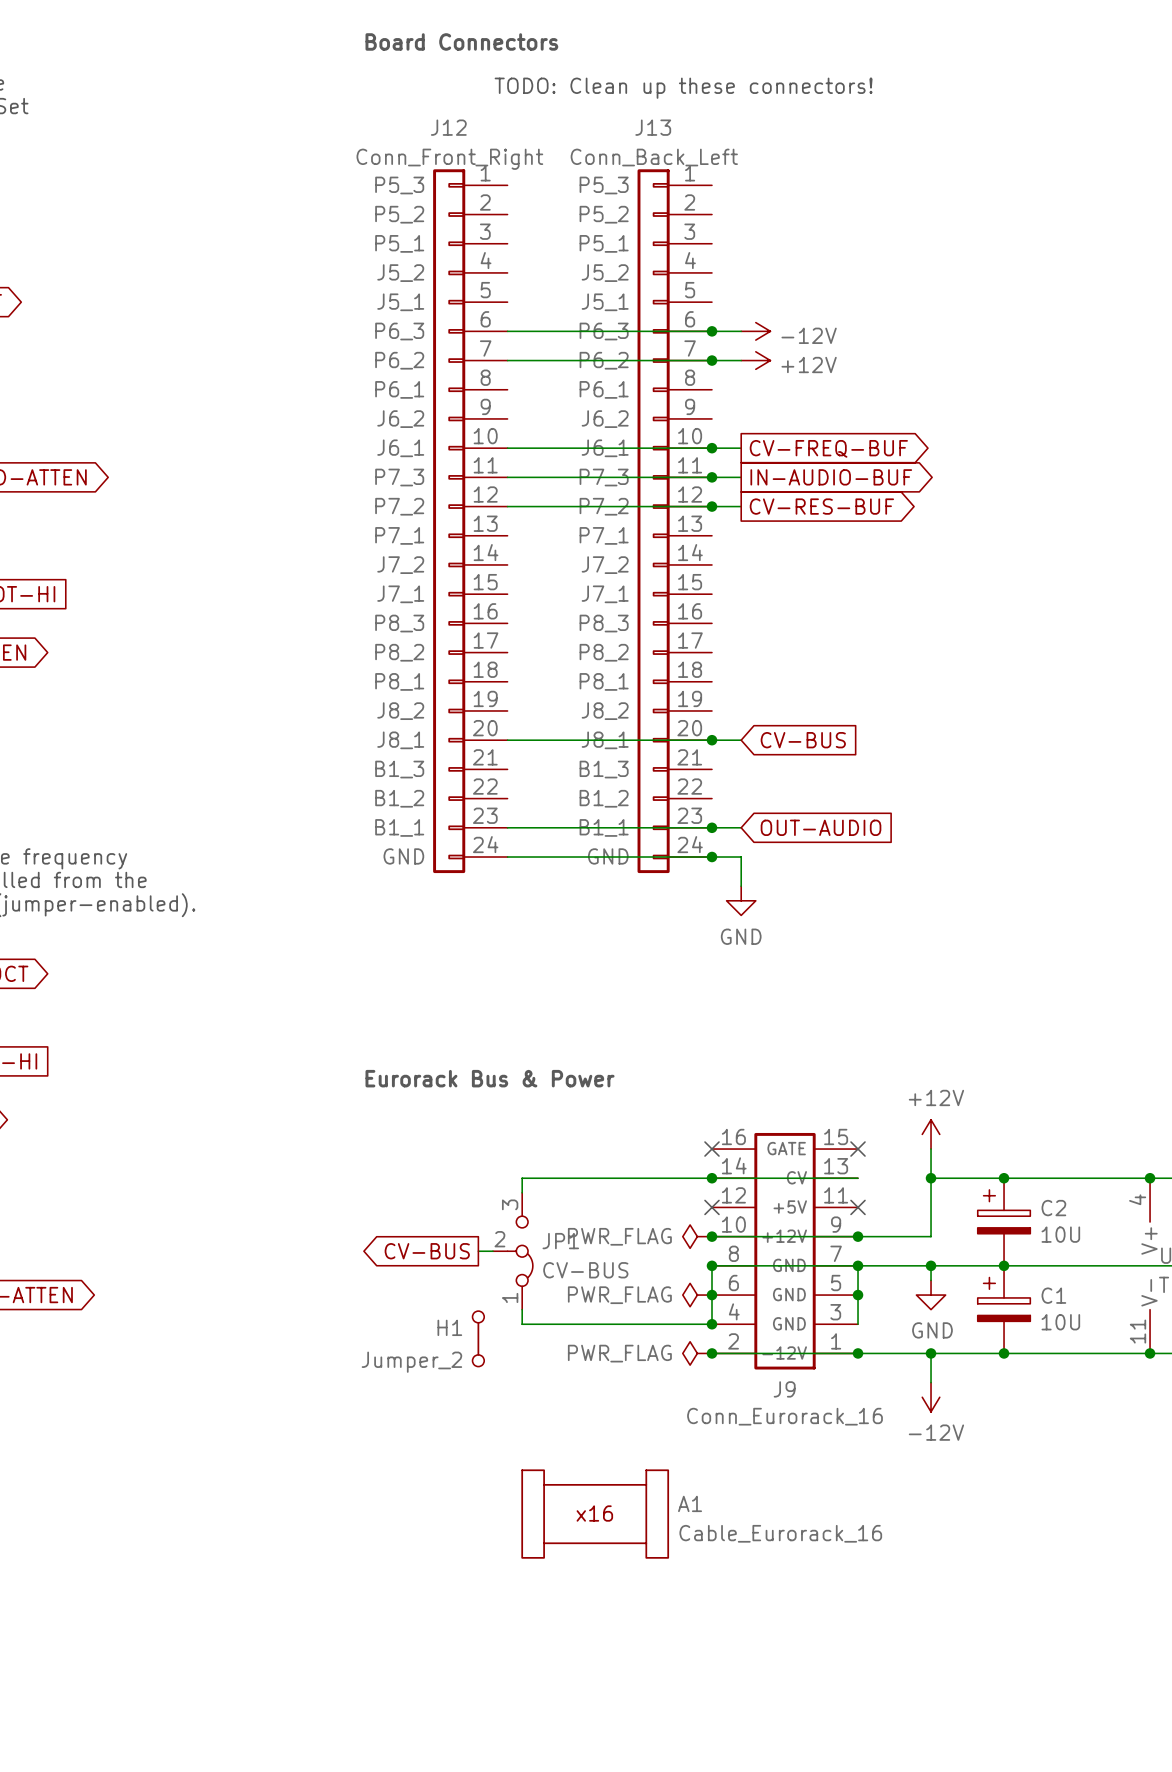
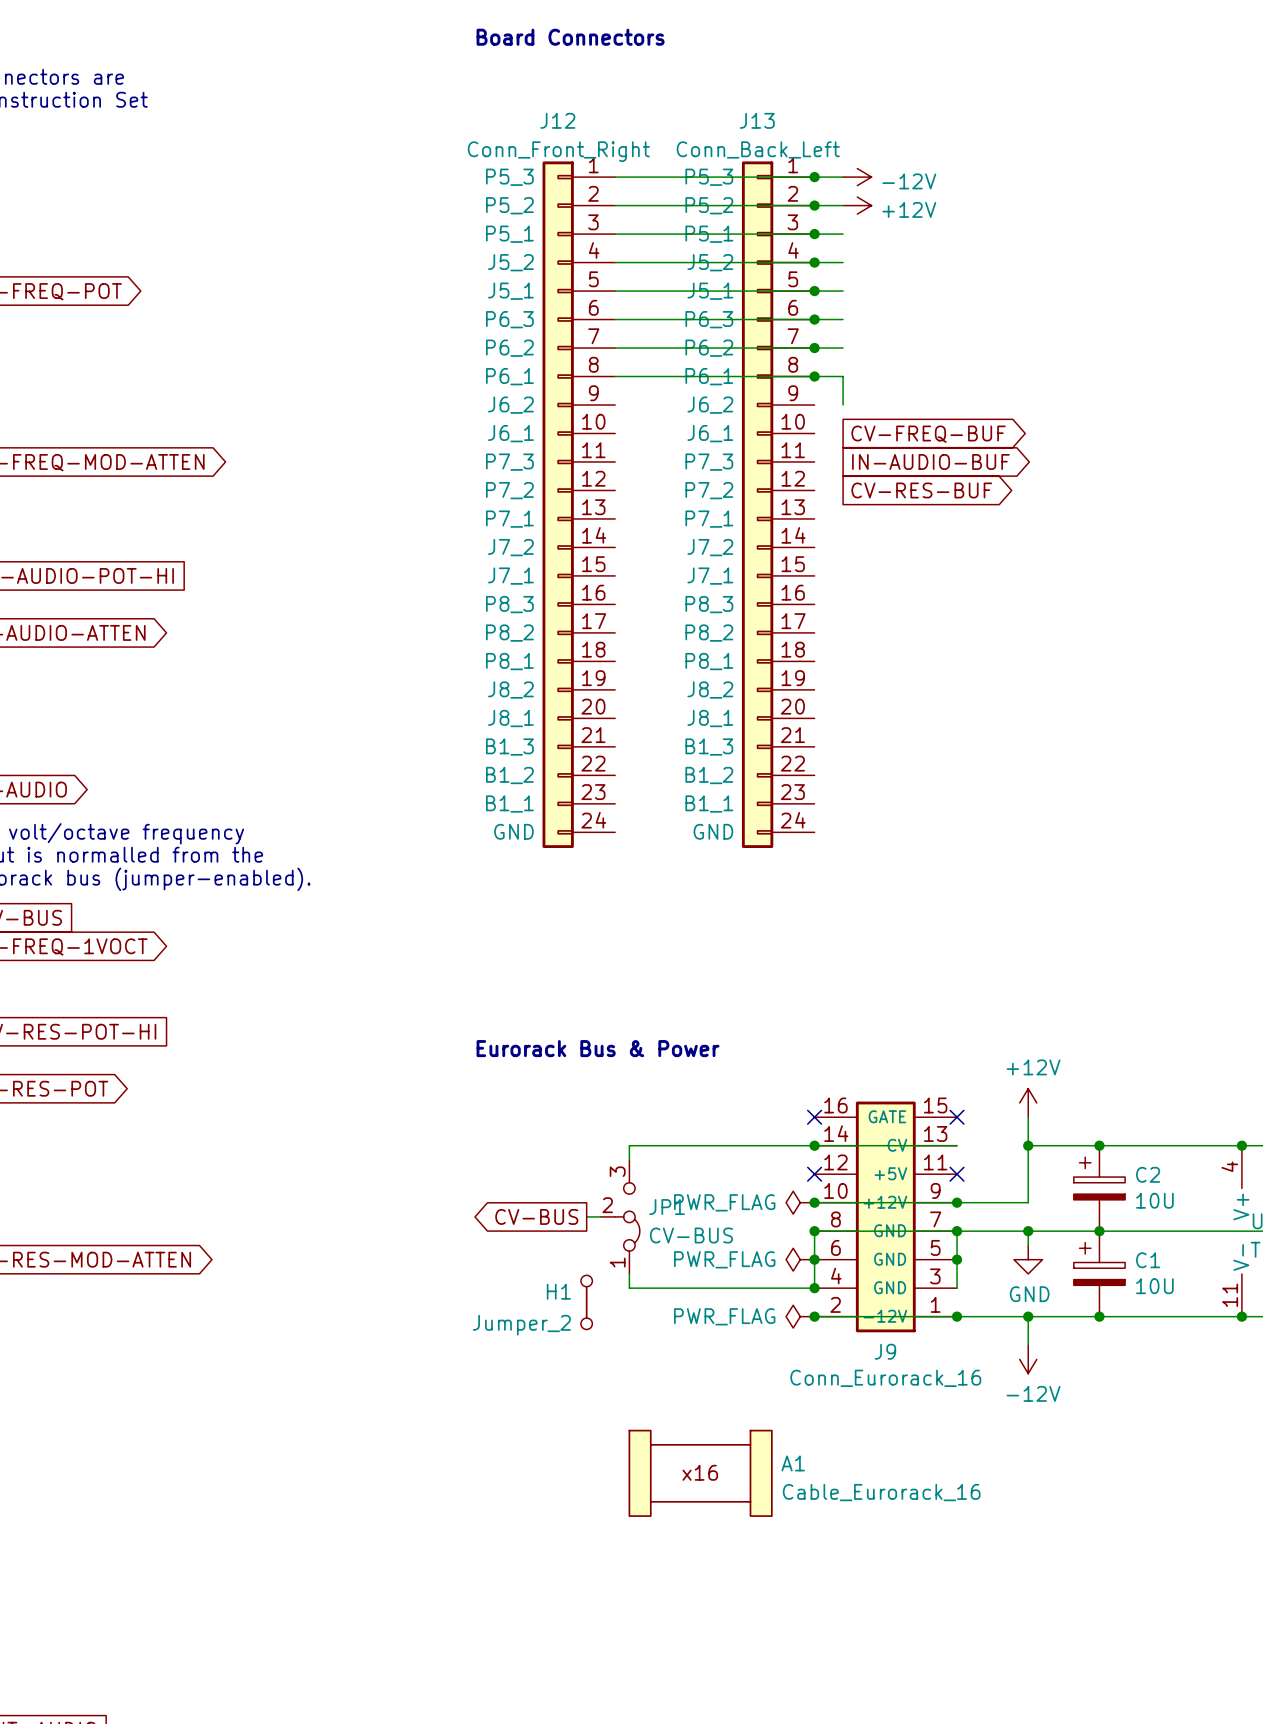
text: TODO: Clean up these connectors! (683, 88) -> none
wire: none -> (615, 177) (843, 177)
junction: none -> (814, 177)
wire: none -> (615, 205) (843, 205)
junction: none -> (814, 205)
junction: none -> (814, 234)
junction: none -> (814, 262)
junction: none -> (814, 291)
power symbol position: -12V (755, 331) -> -12V (857, 177)
power symbol position: +12V (755, 360) -> +12V (857, 205)
wire: none -> (615, 376) (843, 376) (843, 405)
junction: none -> (814, 376)
wire: (507, 448) (741, 448) -> (615, 234) (843, 234)
junction: (712, 448) -> none
wire: (507, 477) (741, 477) -> (615, 262) (843, 262)
junction: (712, 477) -> none
wire: (507, 506) (741, 506) -> (615, 291) (843, 291)
junction: (712, 506) -> none
wire: (507, 740) (741, 740) -> none
junction: (712, 740) -> none
global label: CV-BUS (803, 740) -> none
wire: (507, 827) (741, 827) -> none
junction: (712, 827) -> none
global label: OUT-AUDIO (821, 827) -> none
wire: (507, 857) (741, 857) (741, 886) -> none
junction: (712, 857) -> none
power symbol: GND (741, 900) -> none

